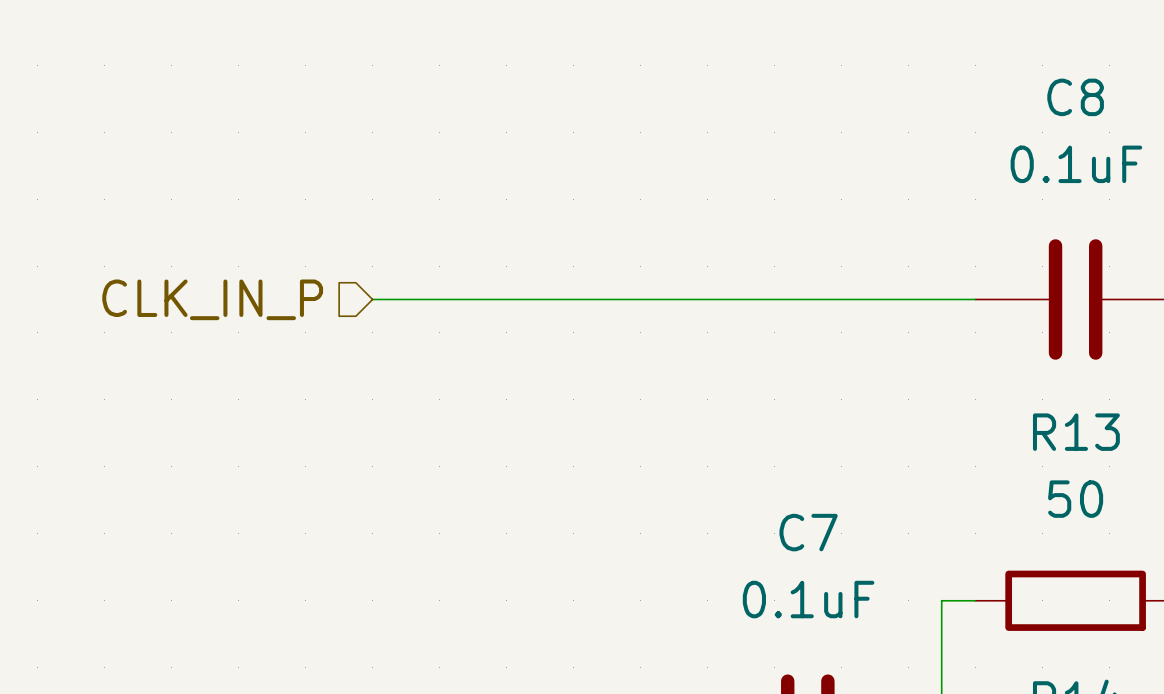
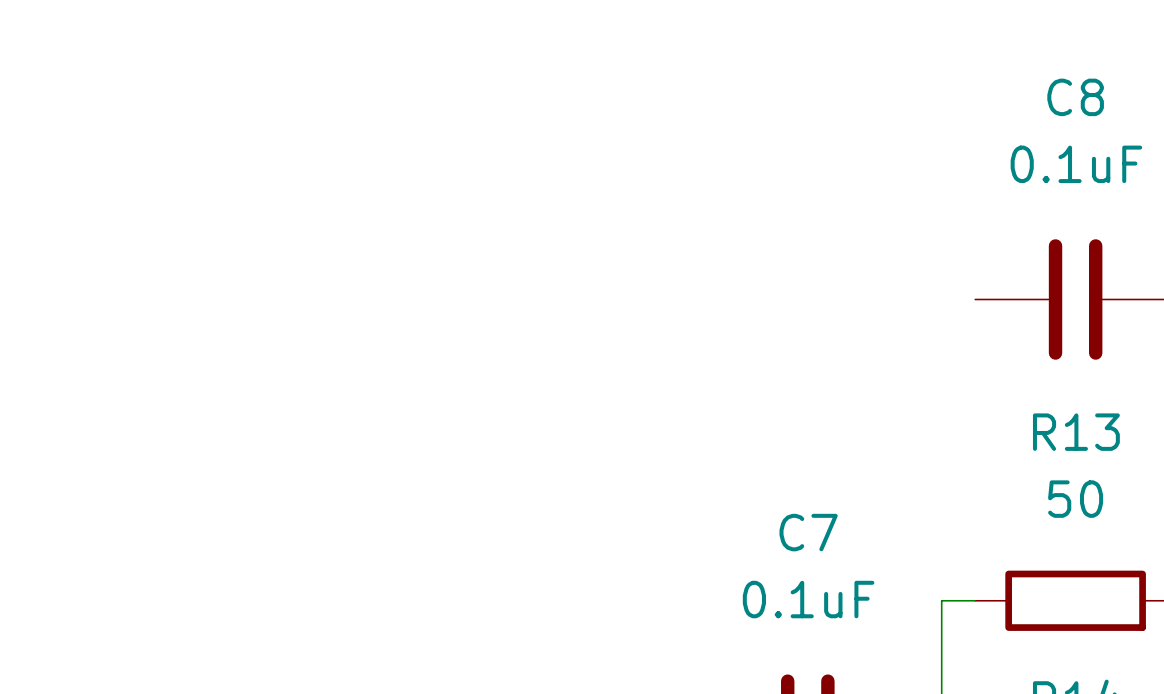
hierarchical label: CLK_IN_P (212, 299) -> none
wire: (372, 299) (975, 299) -> none

